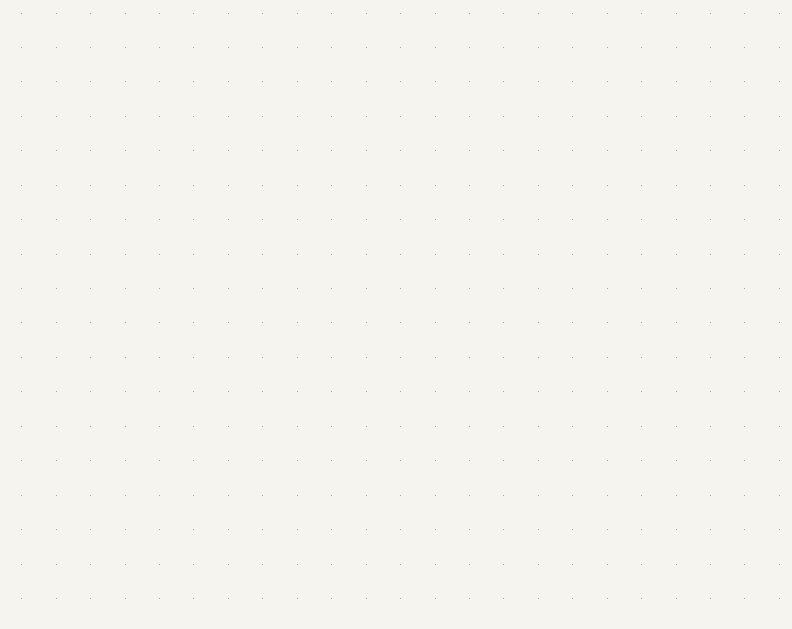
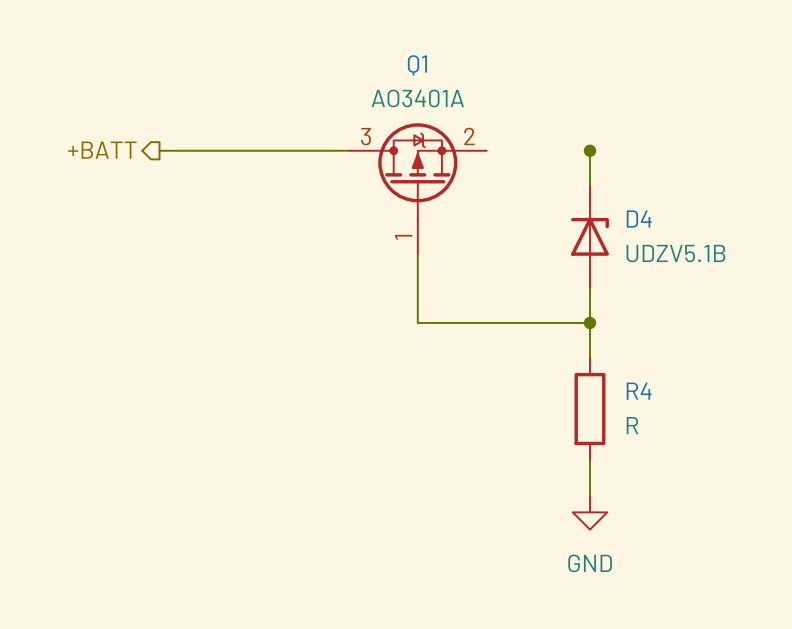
hierarchical label: none -> +BATT (102, 150)
wire: none -> (159, 150) (348, 150)
wire: none -> (589, 150) (589, 185)
junction: none -> (589, 150)
Q1: none -> AO3401A (417, 188)
D4: none -> UDZV5.1B (589, 236)
wire: none -> (417, 254) (417, 322) (589, 322)
wire: none -> (589, 288) (589, 357)
junction: none -> (589, 322)
R4: none -> R (589, 409)
wire: none -> (589, 460) (589, 495)
power symbol: none -> GND (589, 512)

